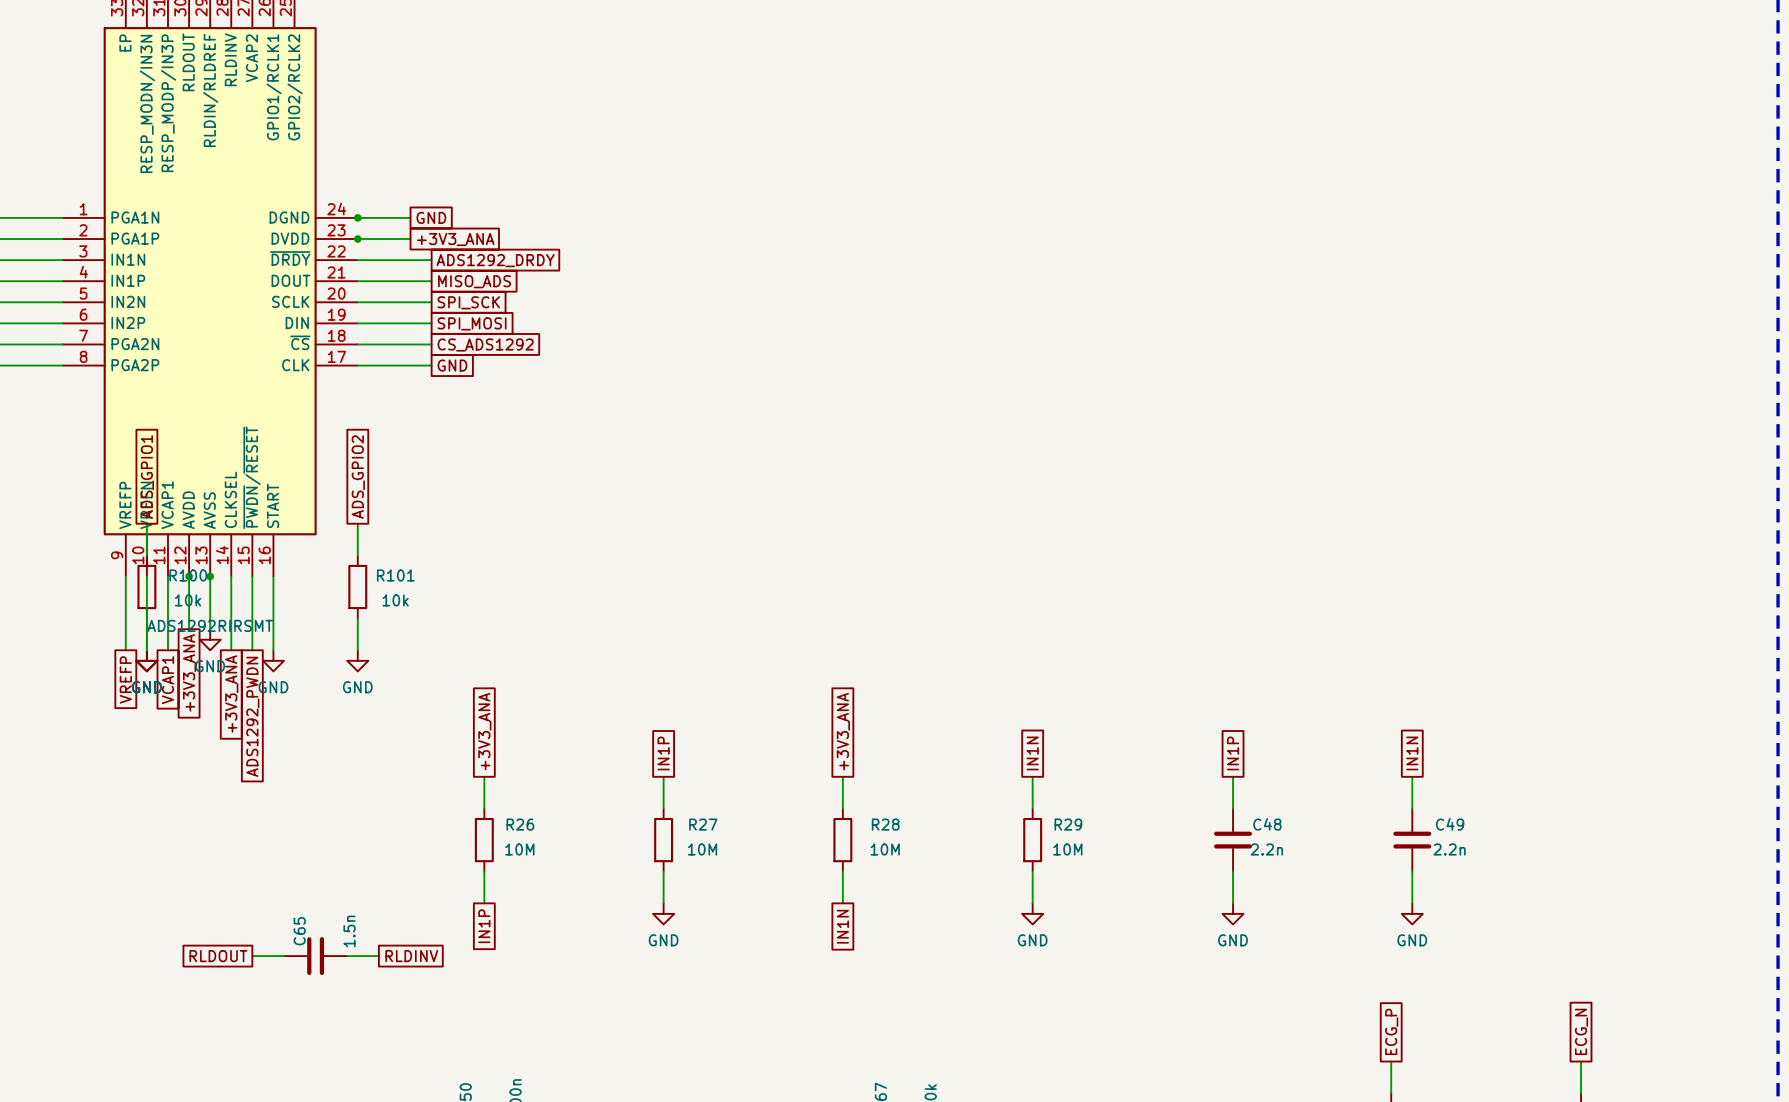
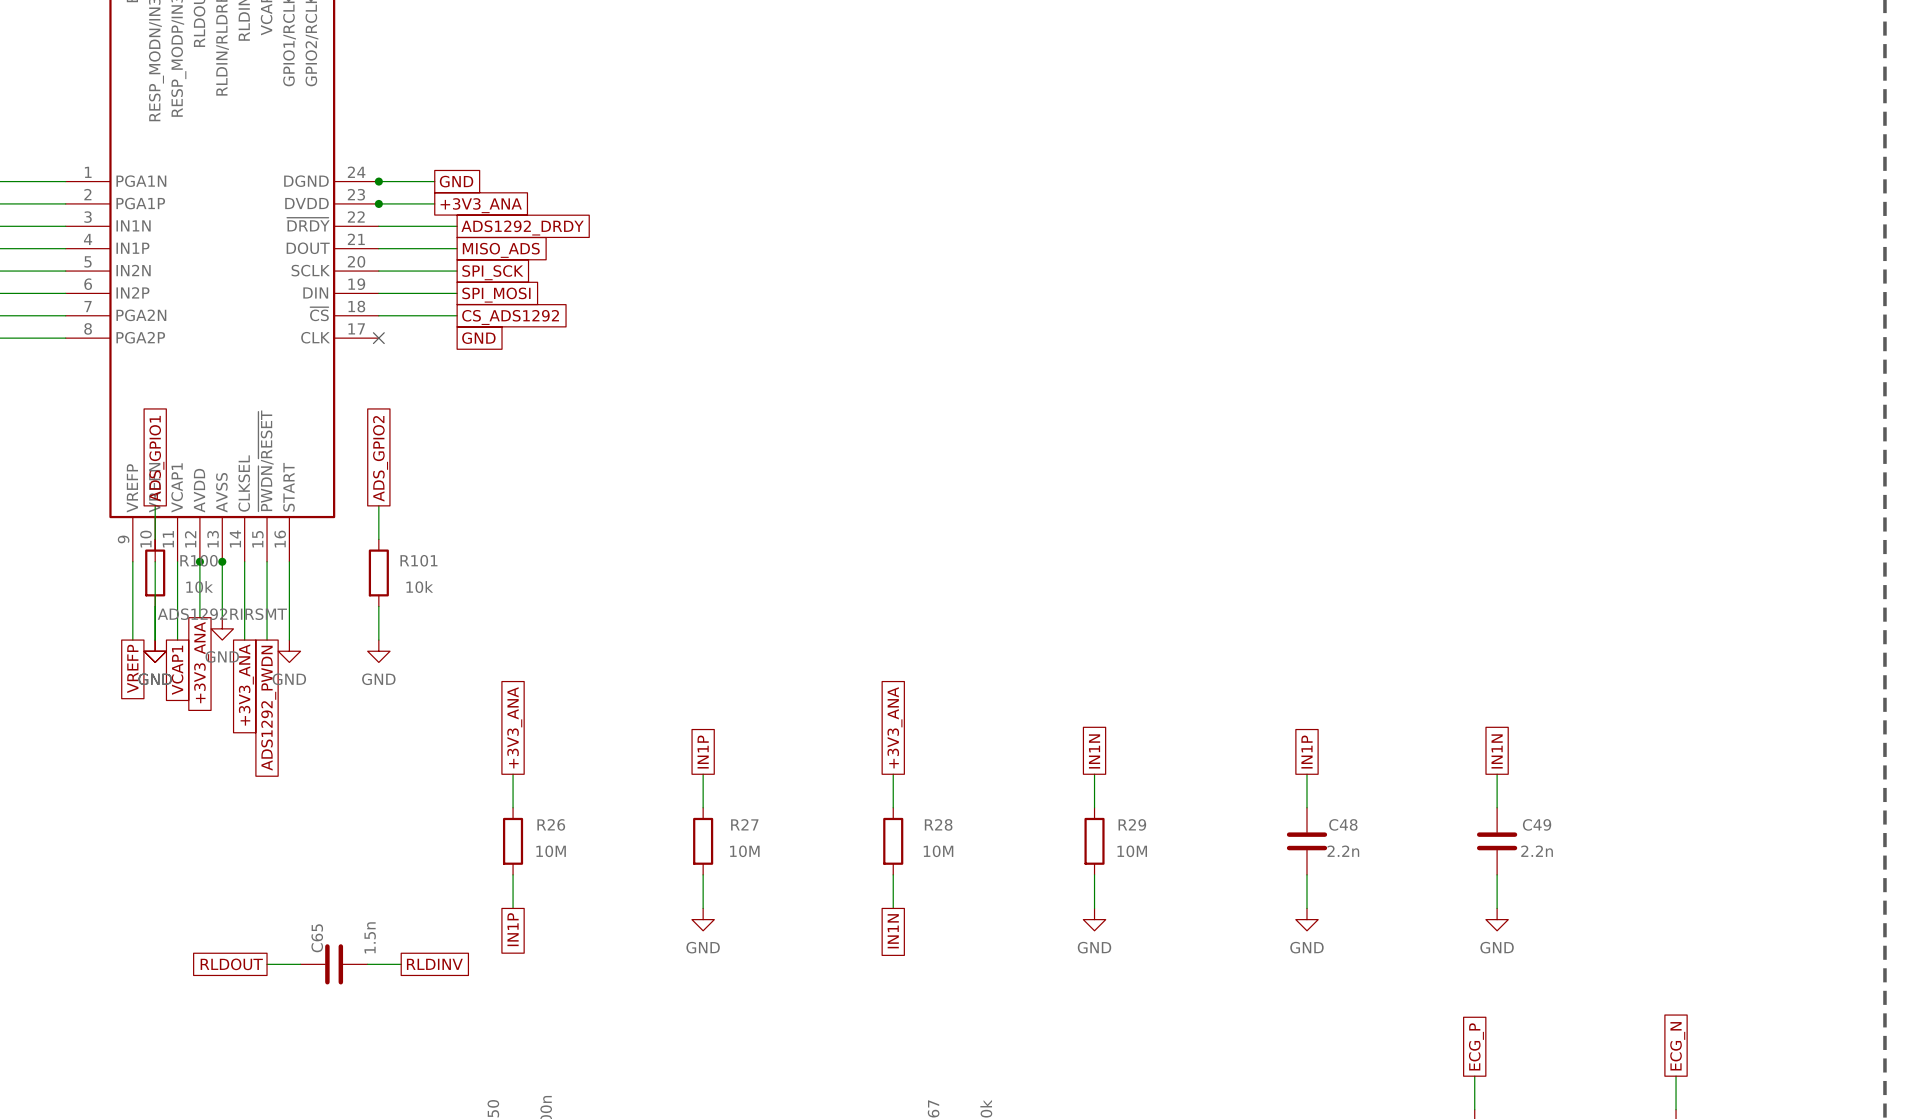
wire: (357, 365) (431, 365) -> none
no-connect mark: none -> (378, 338)

